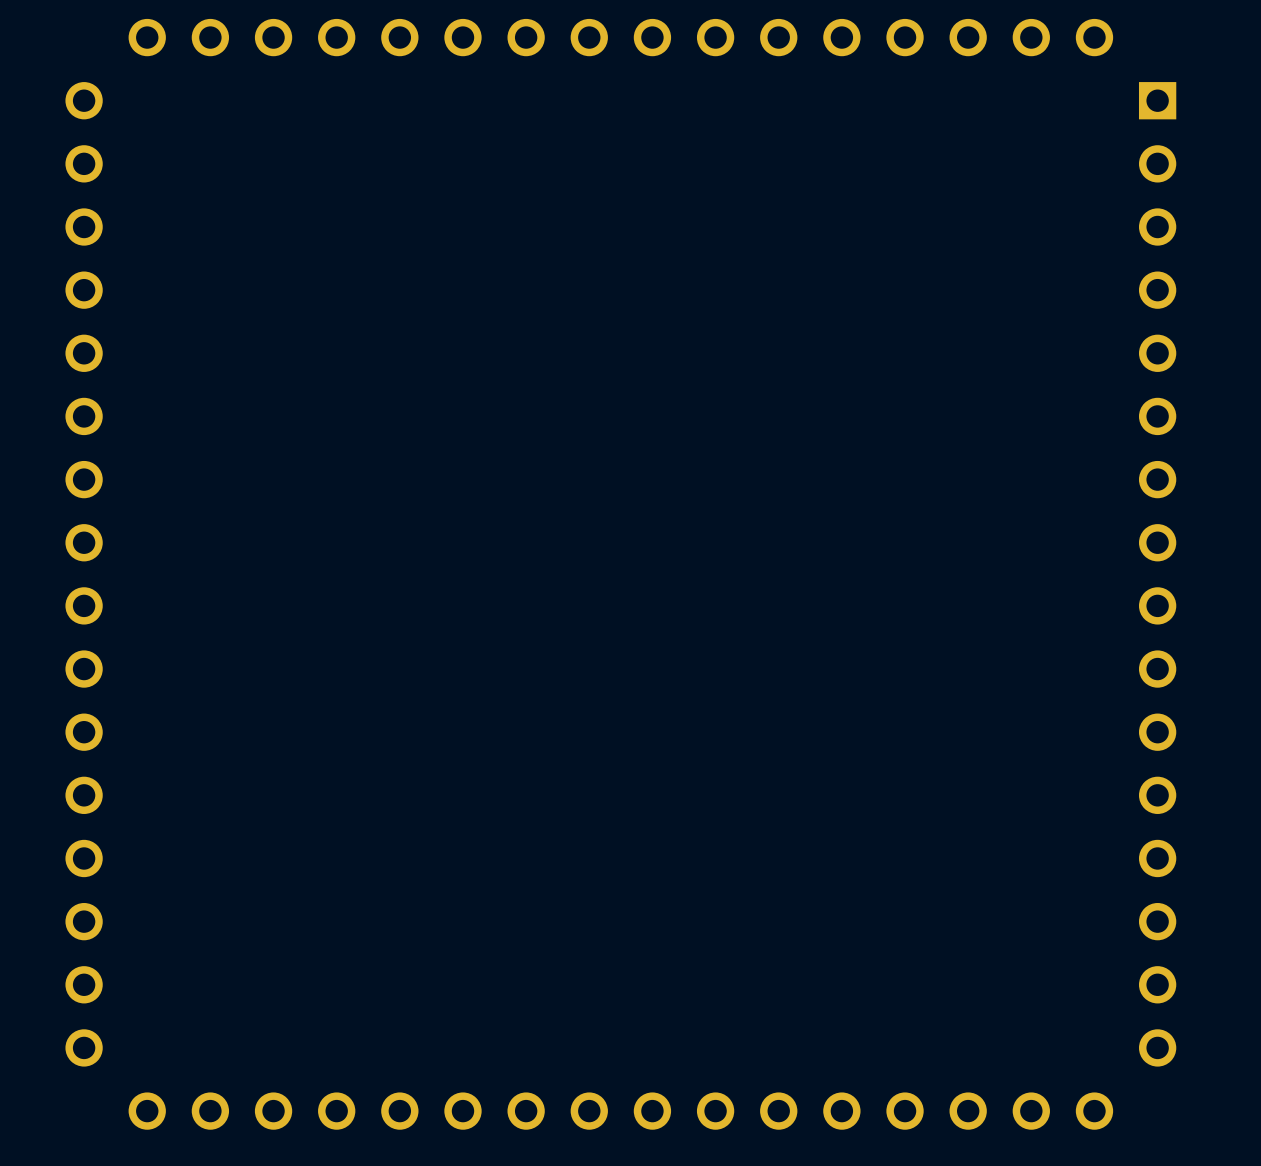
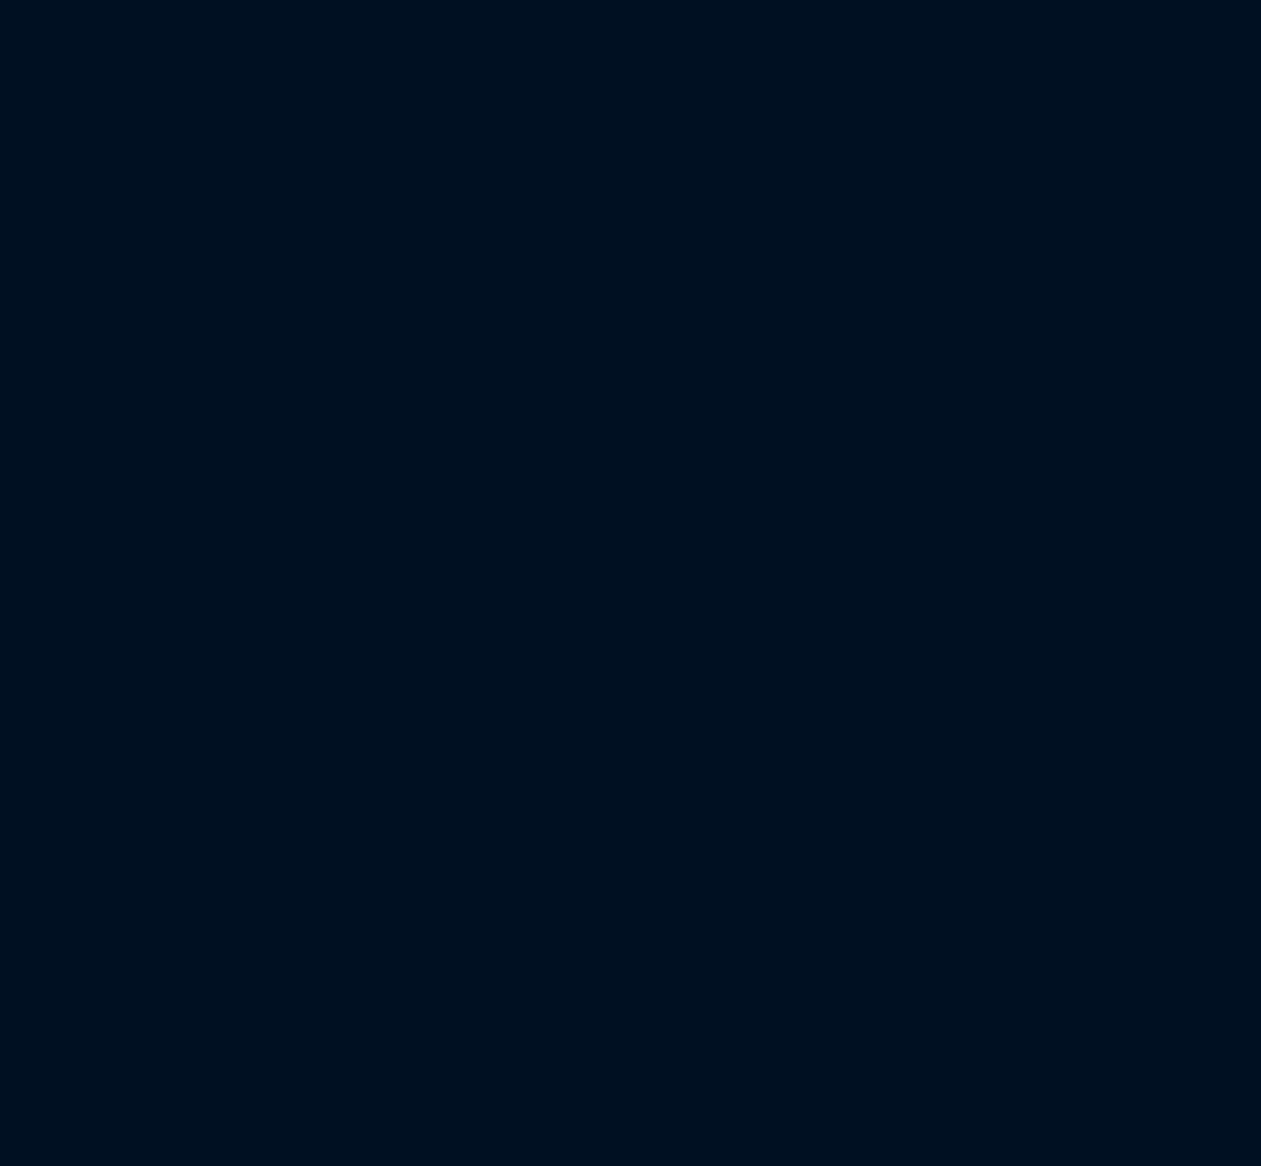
part: (620, 574) -> none

